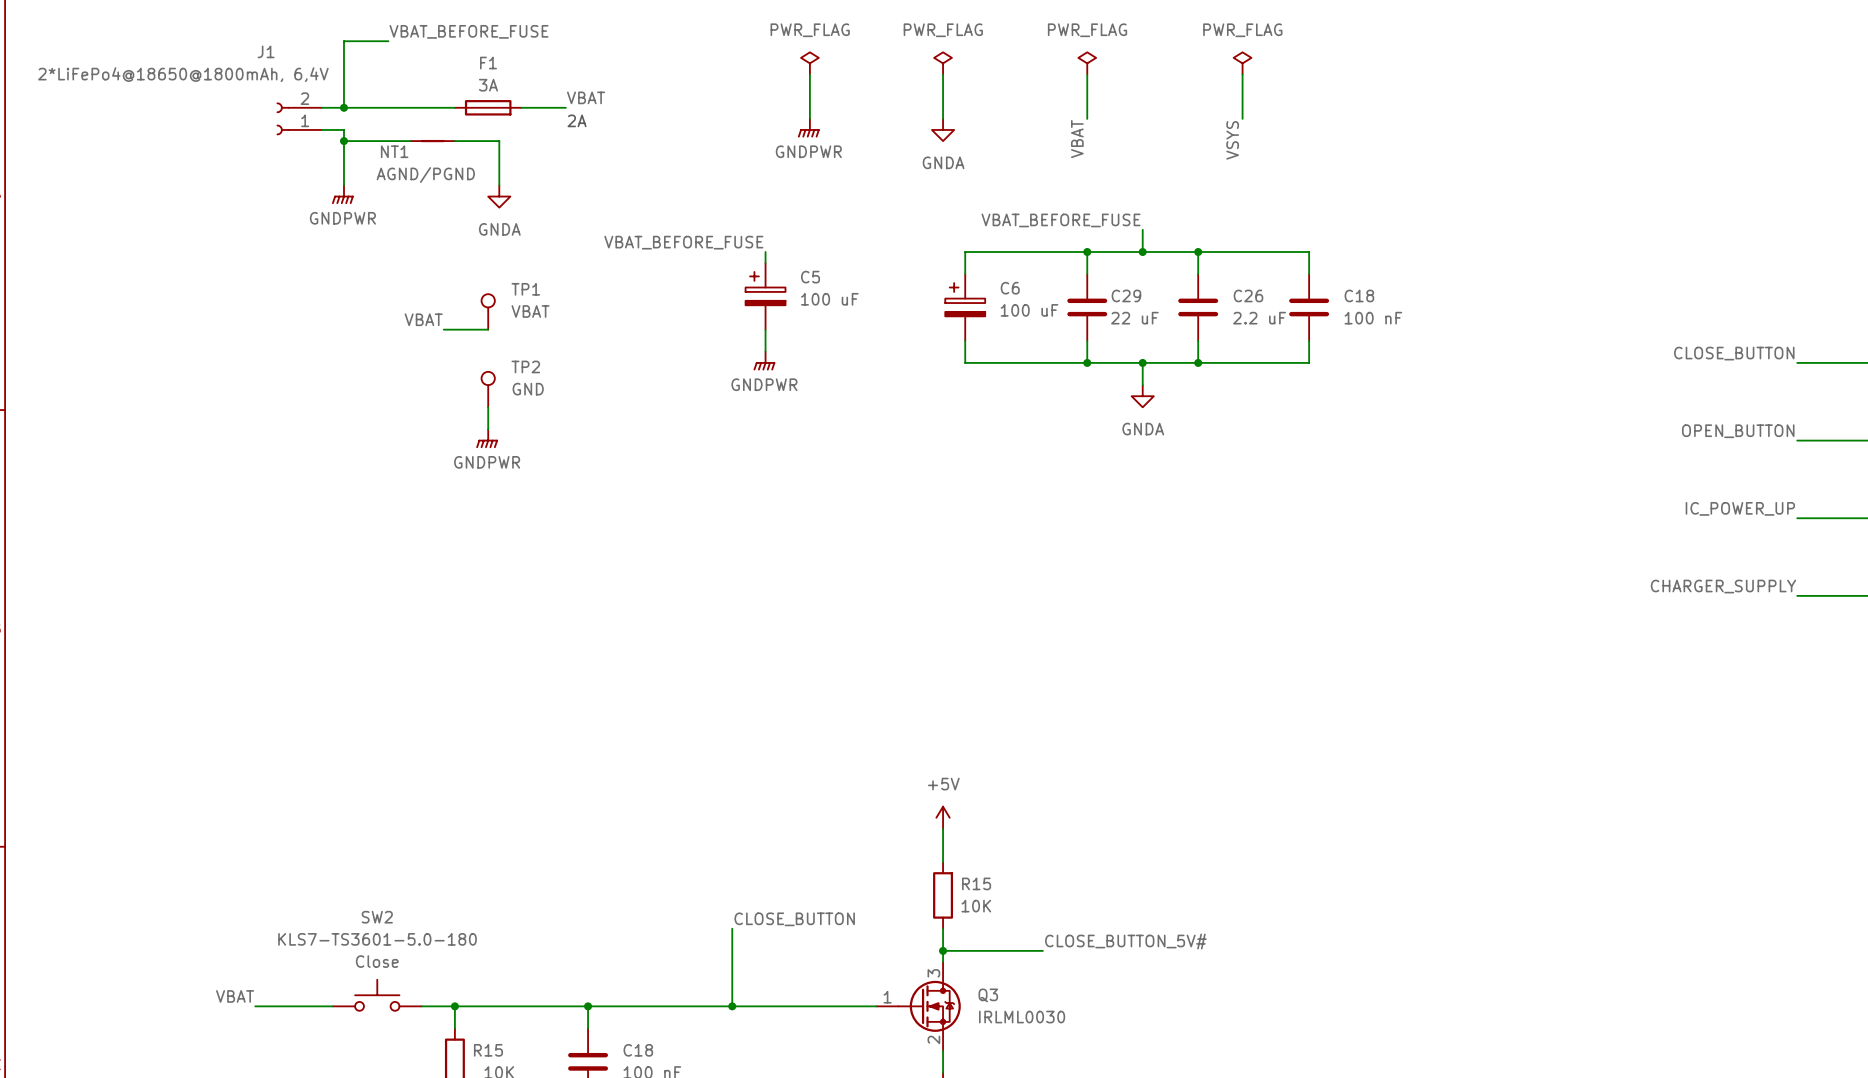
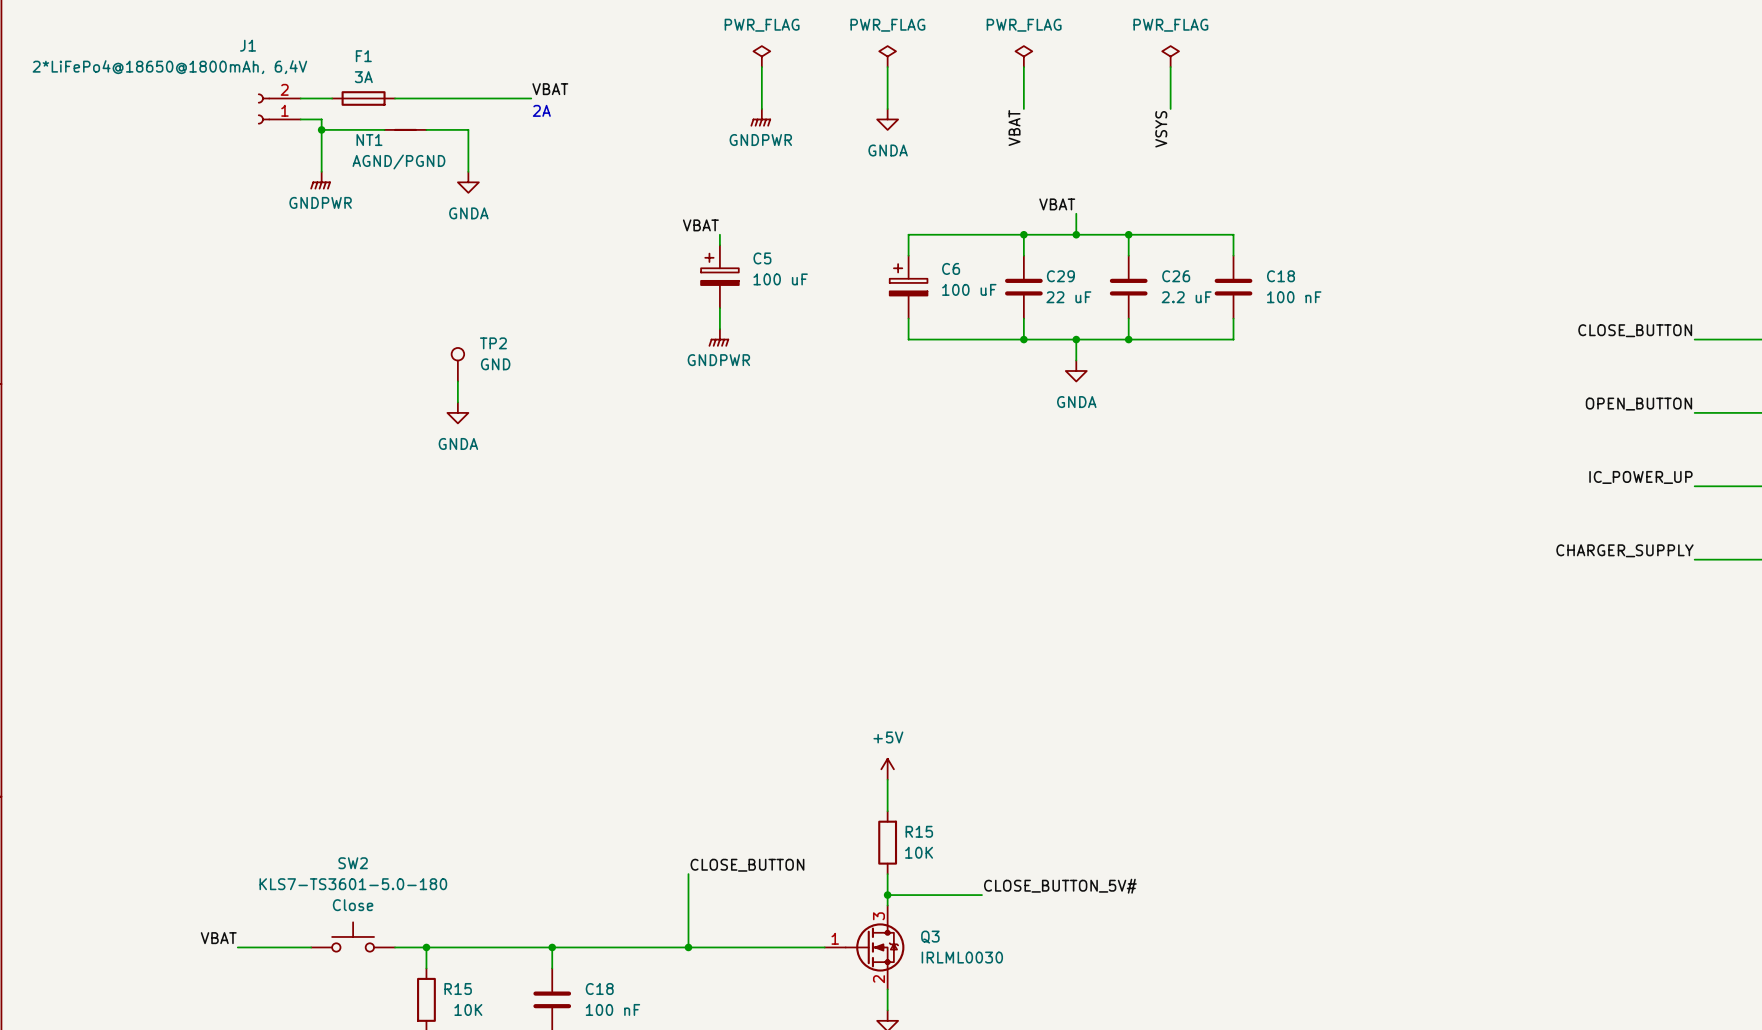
label: VBAT_BEFORE_FUSE (469, 31) -> none
wire: (388, 41) (343, 41) (343, 107) -> none
junction: (343, 107) -> none
F1 position: (488, 107) -> (363, 98)
label: VBAT_BEFORE_FUSE (1061, 220) -> VBAT (1057, 204)
label: VBAT_BEFORE_FUSE (683, 242) -> VBAT (700, 225)
TP1: VBAT (488, 311) -> none
label: VBAT (423, 319) -> none
wire: (443, 329) (488, 329) -> none
power symbol: GNDPWR (487, 438) -> GNDA (457, 412)

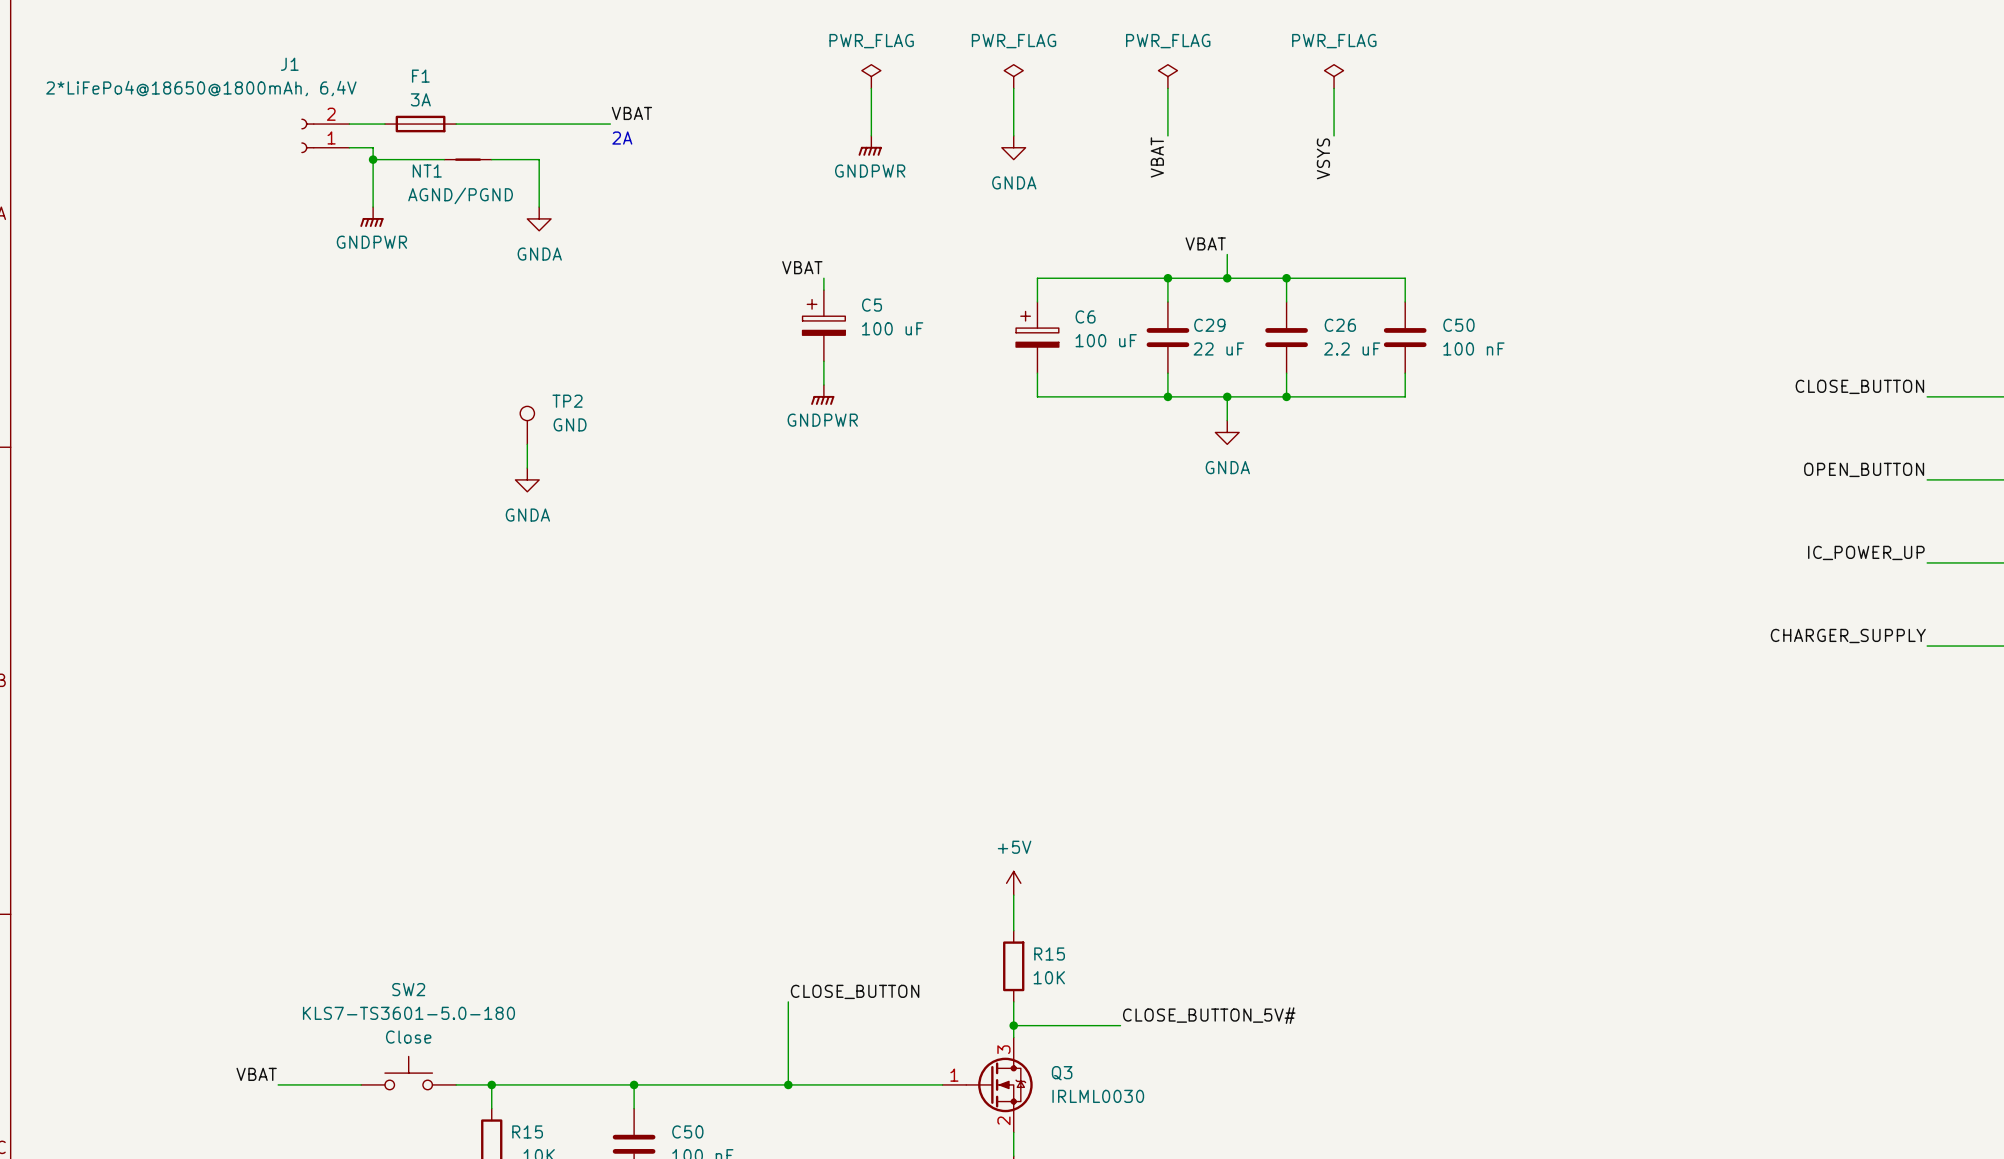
C18 name: C18 (1281, 276) -> C50 (1458, 325)
C18 name: C18 (599, 989) -> C50 (687, 1131)

